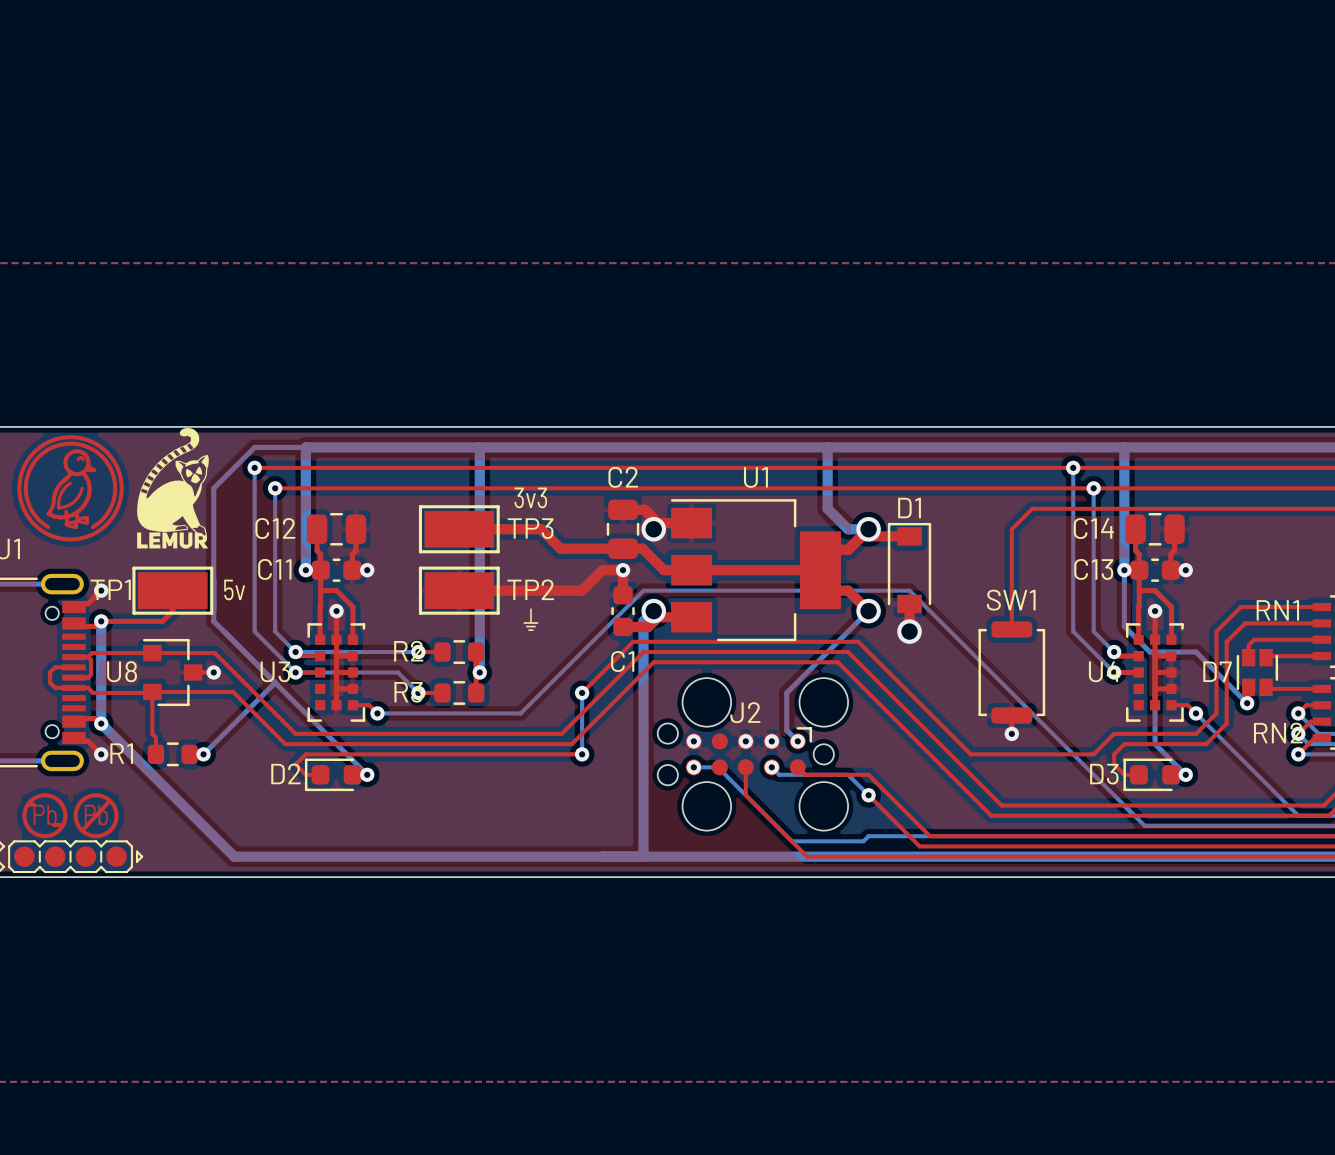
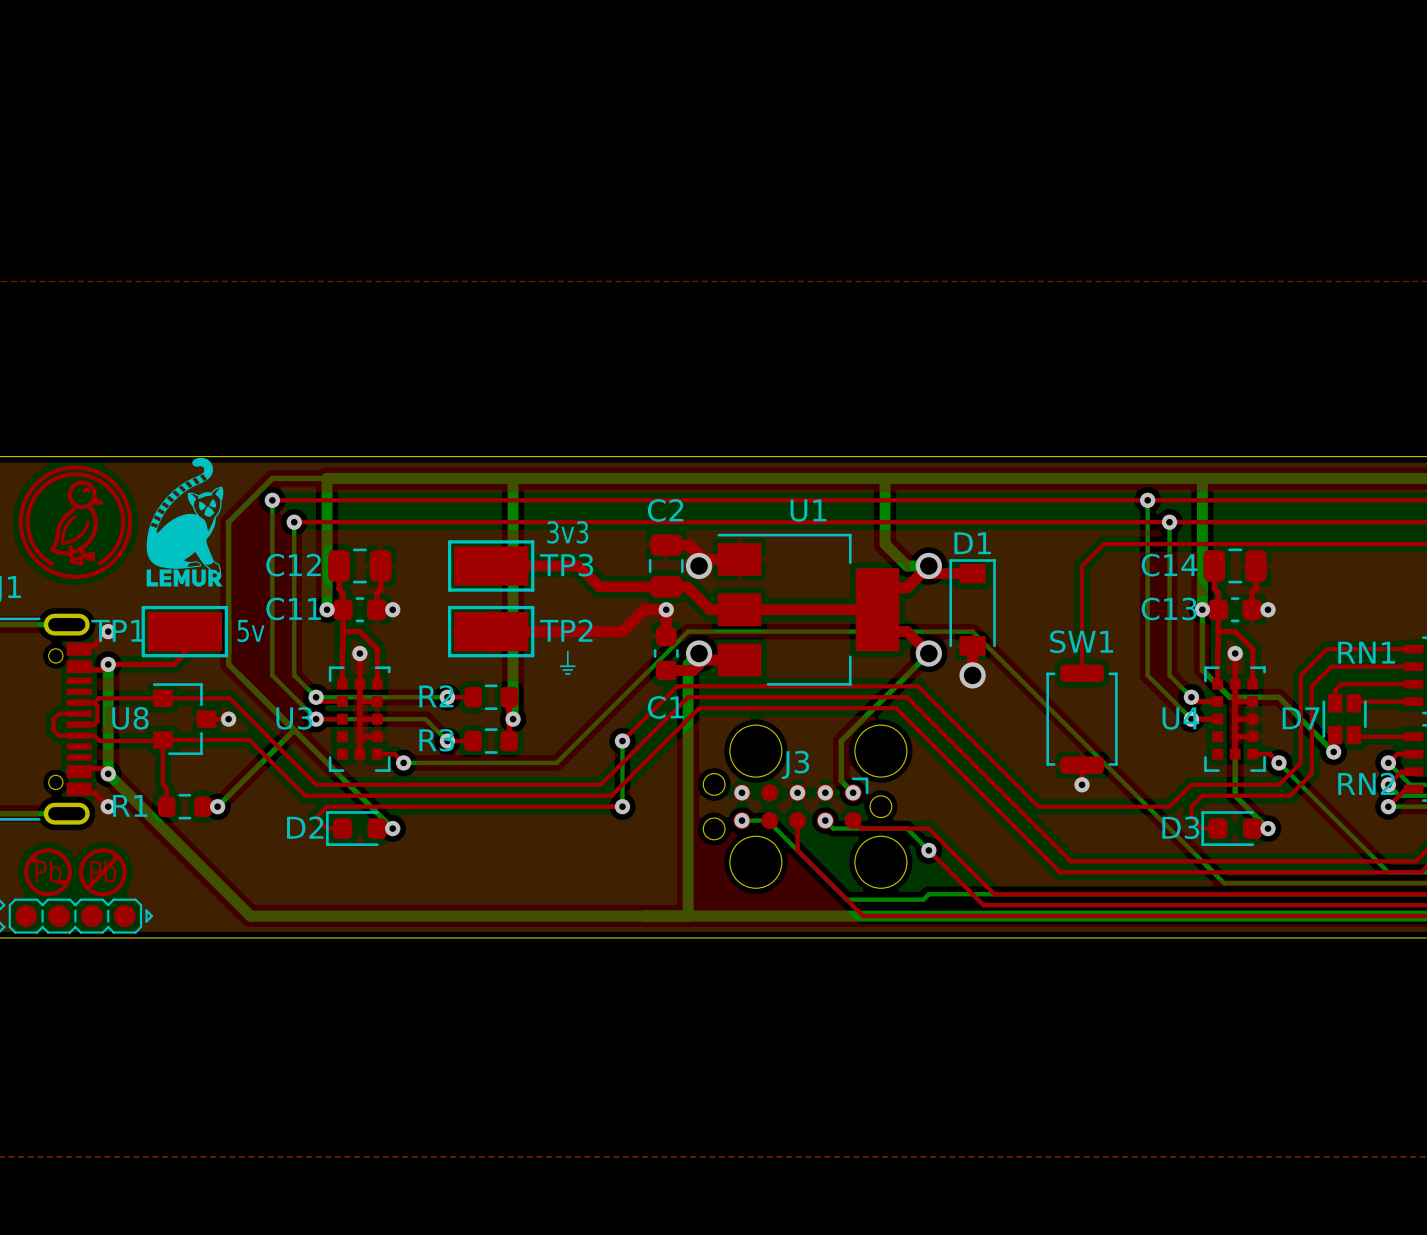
J2 name: J2 (745, 712) -> J3 (795, 764)

